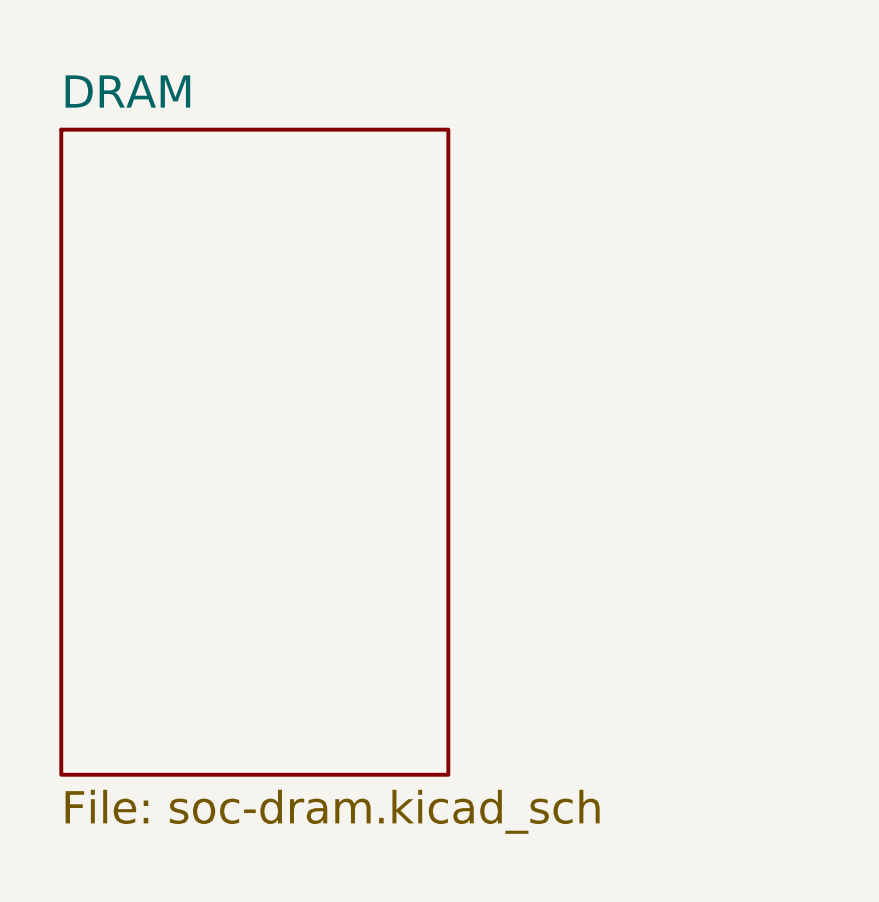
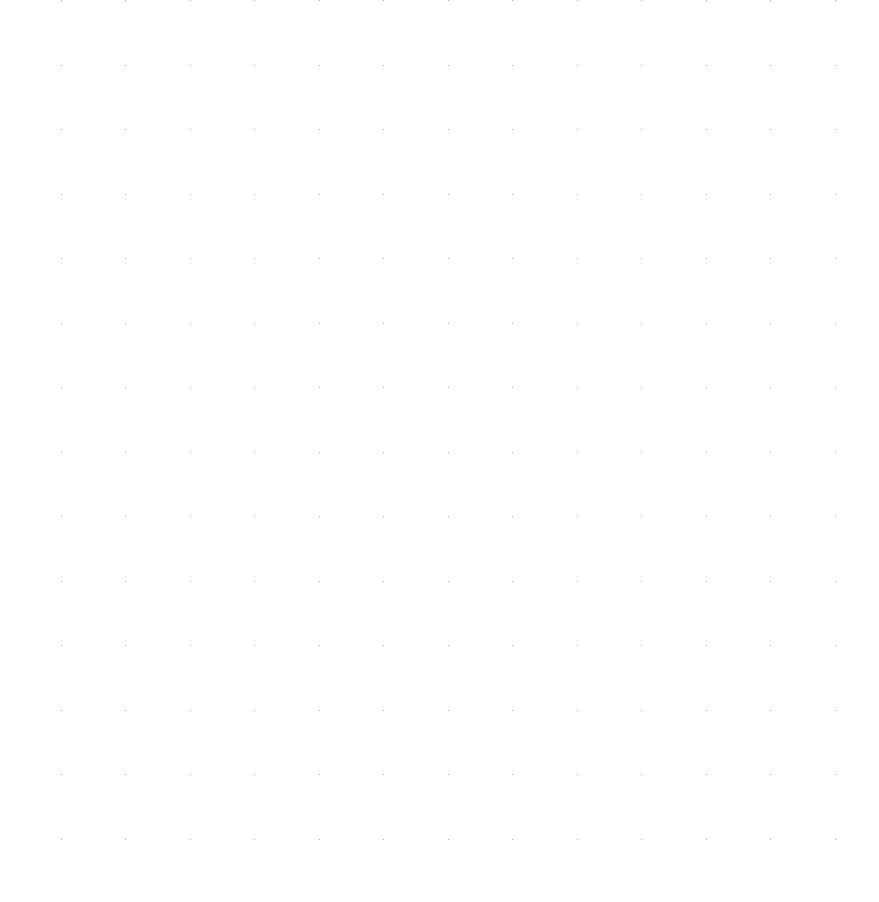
sheet DRAM: File: soc-dram.kicad_sch (254, 452) -> none

